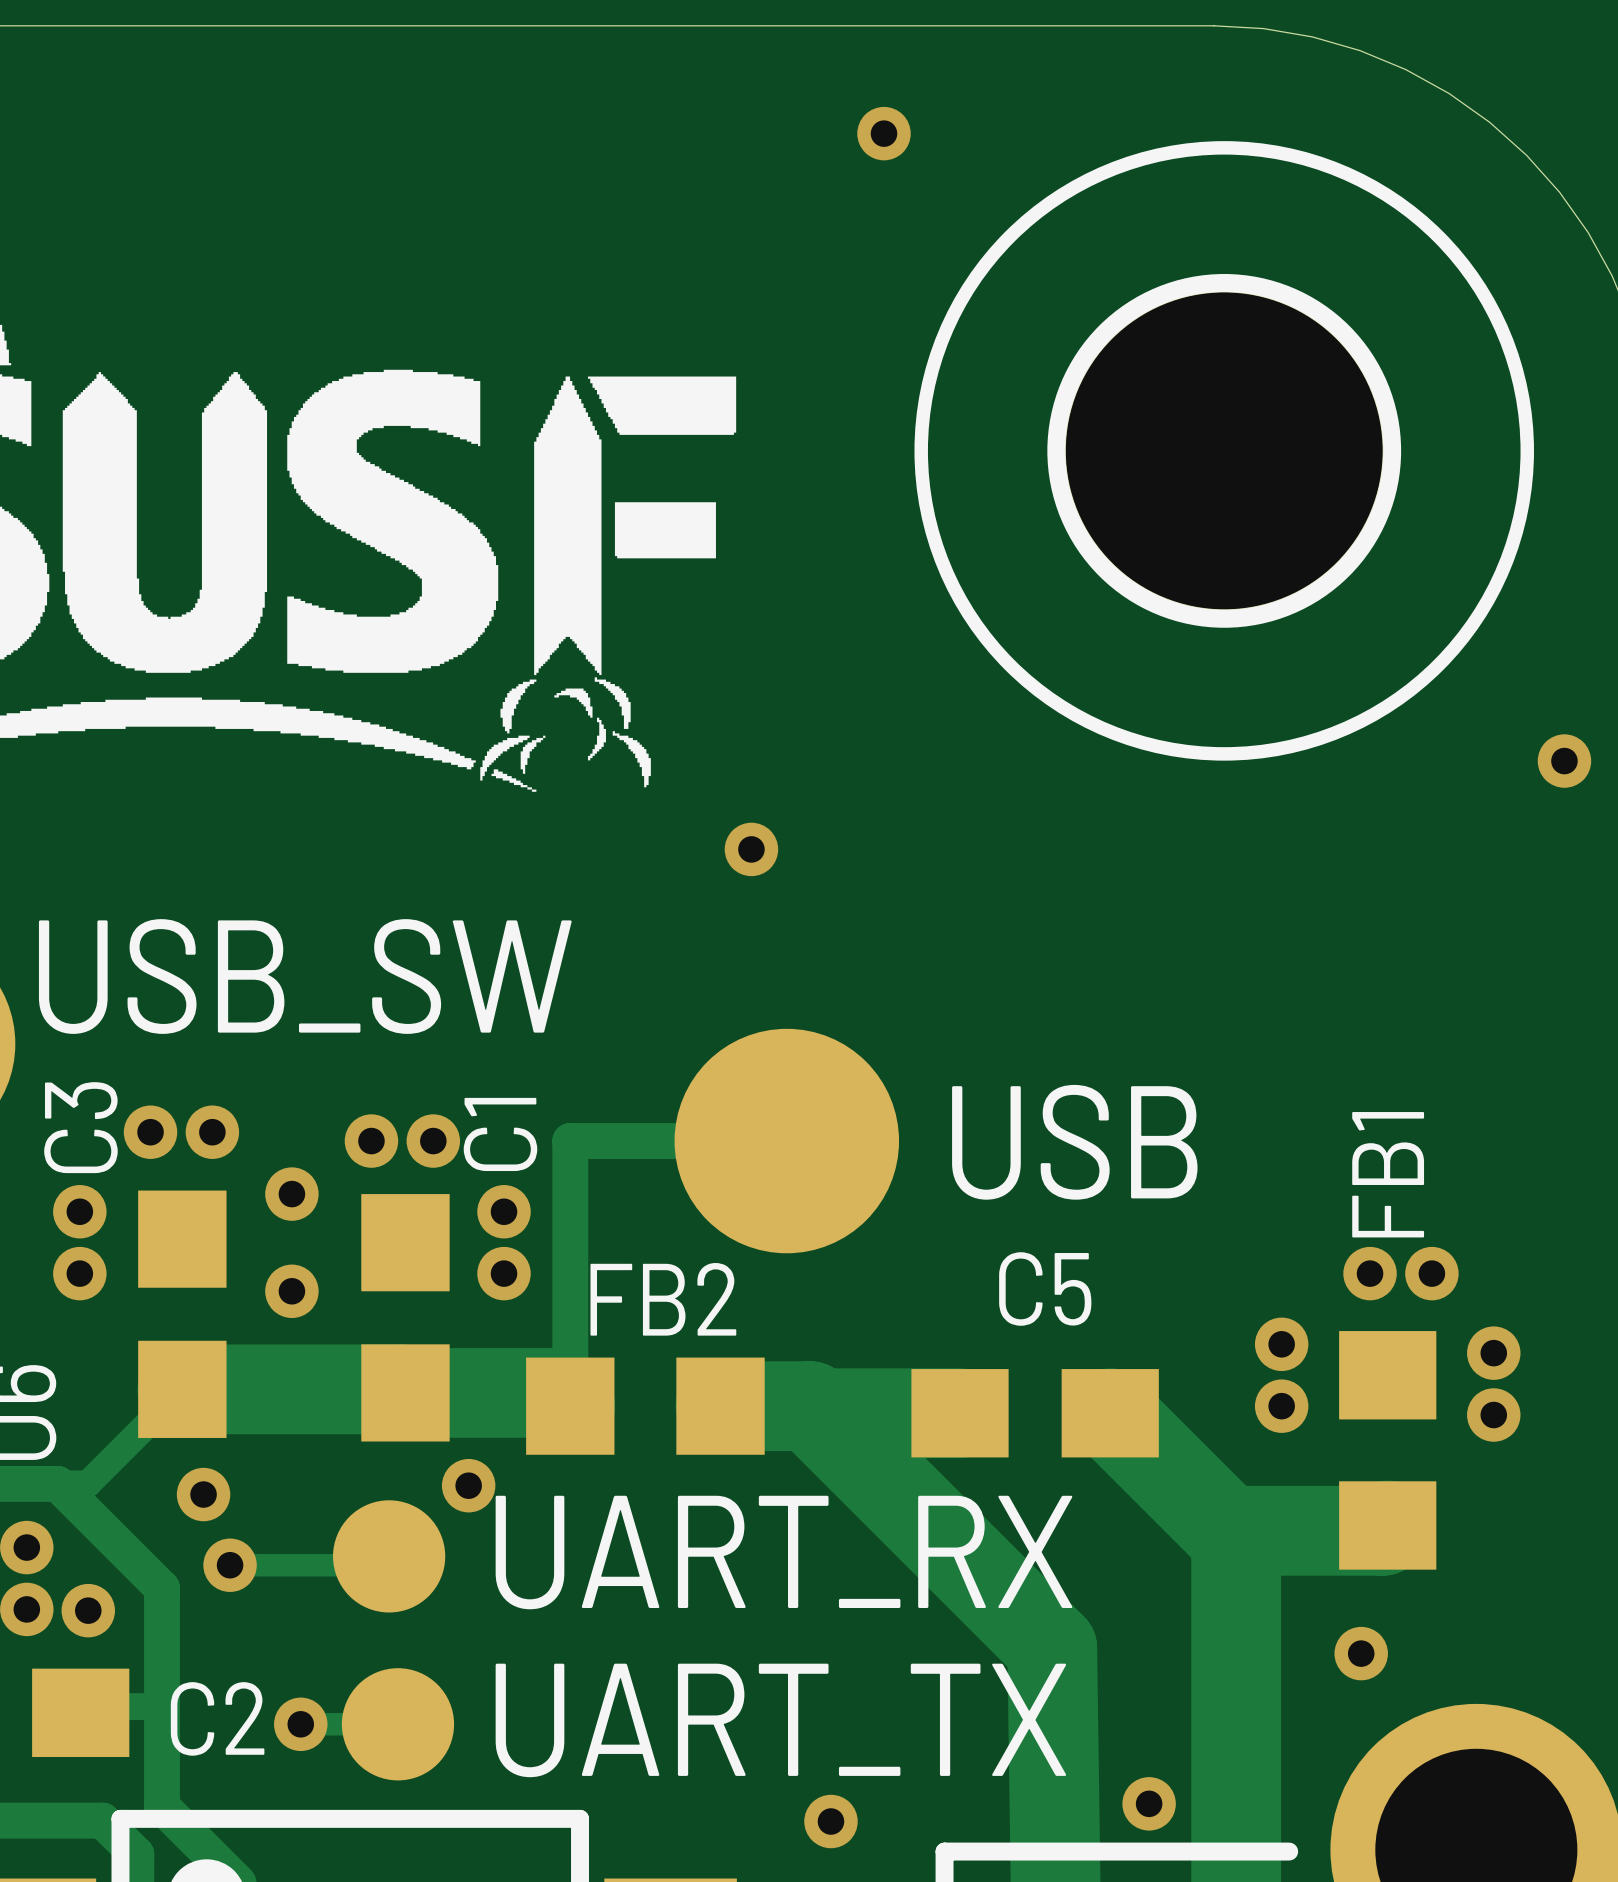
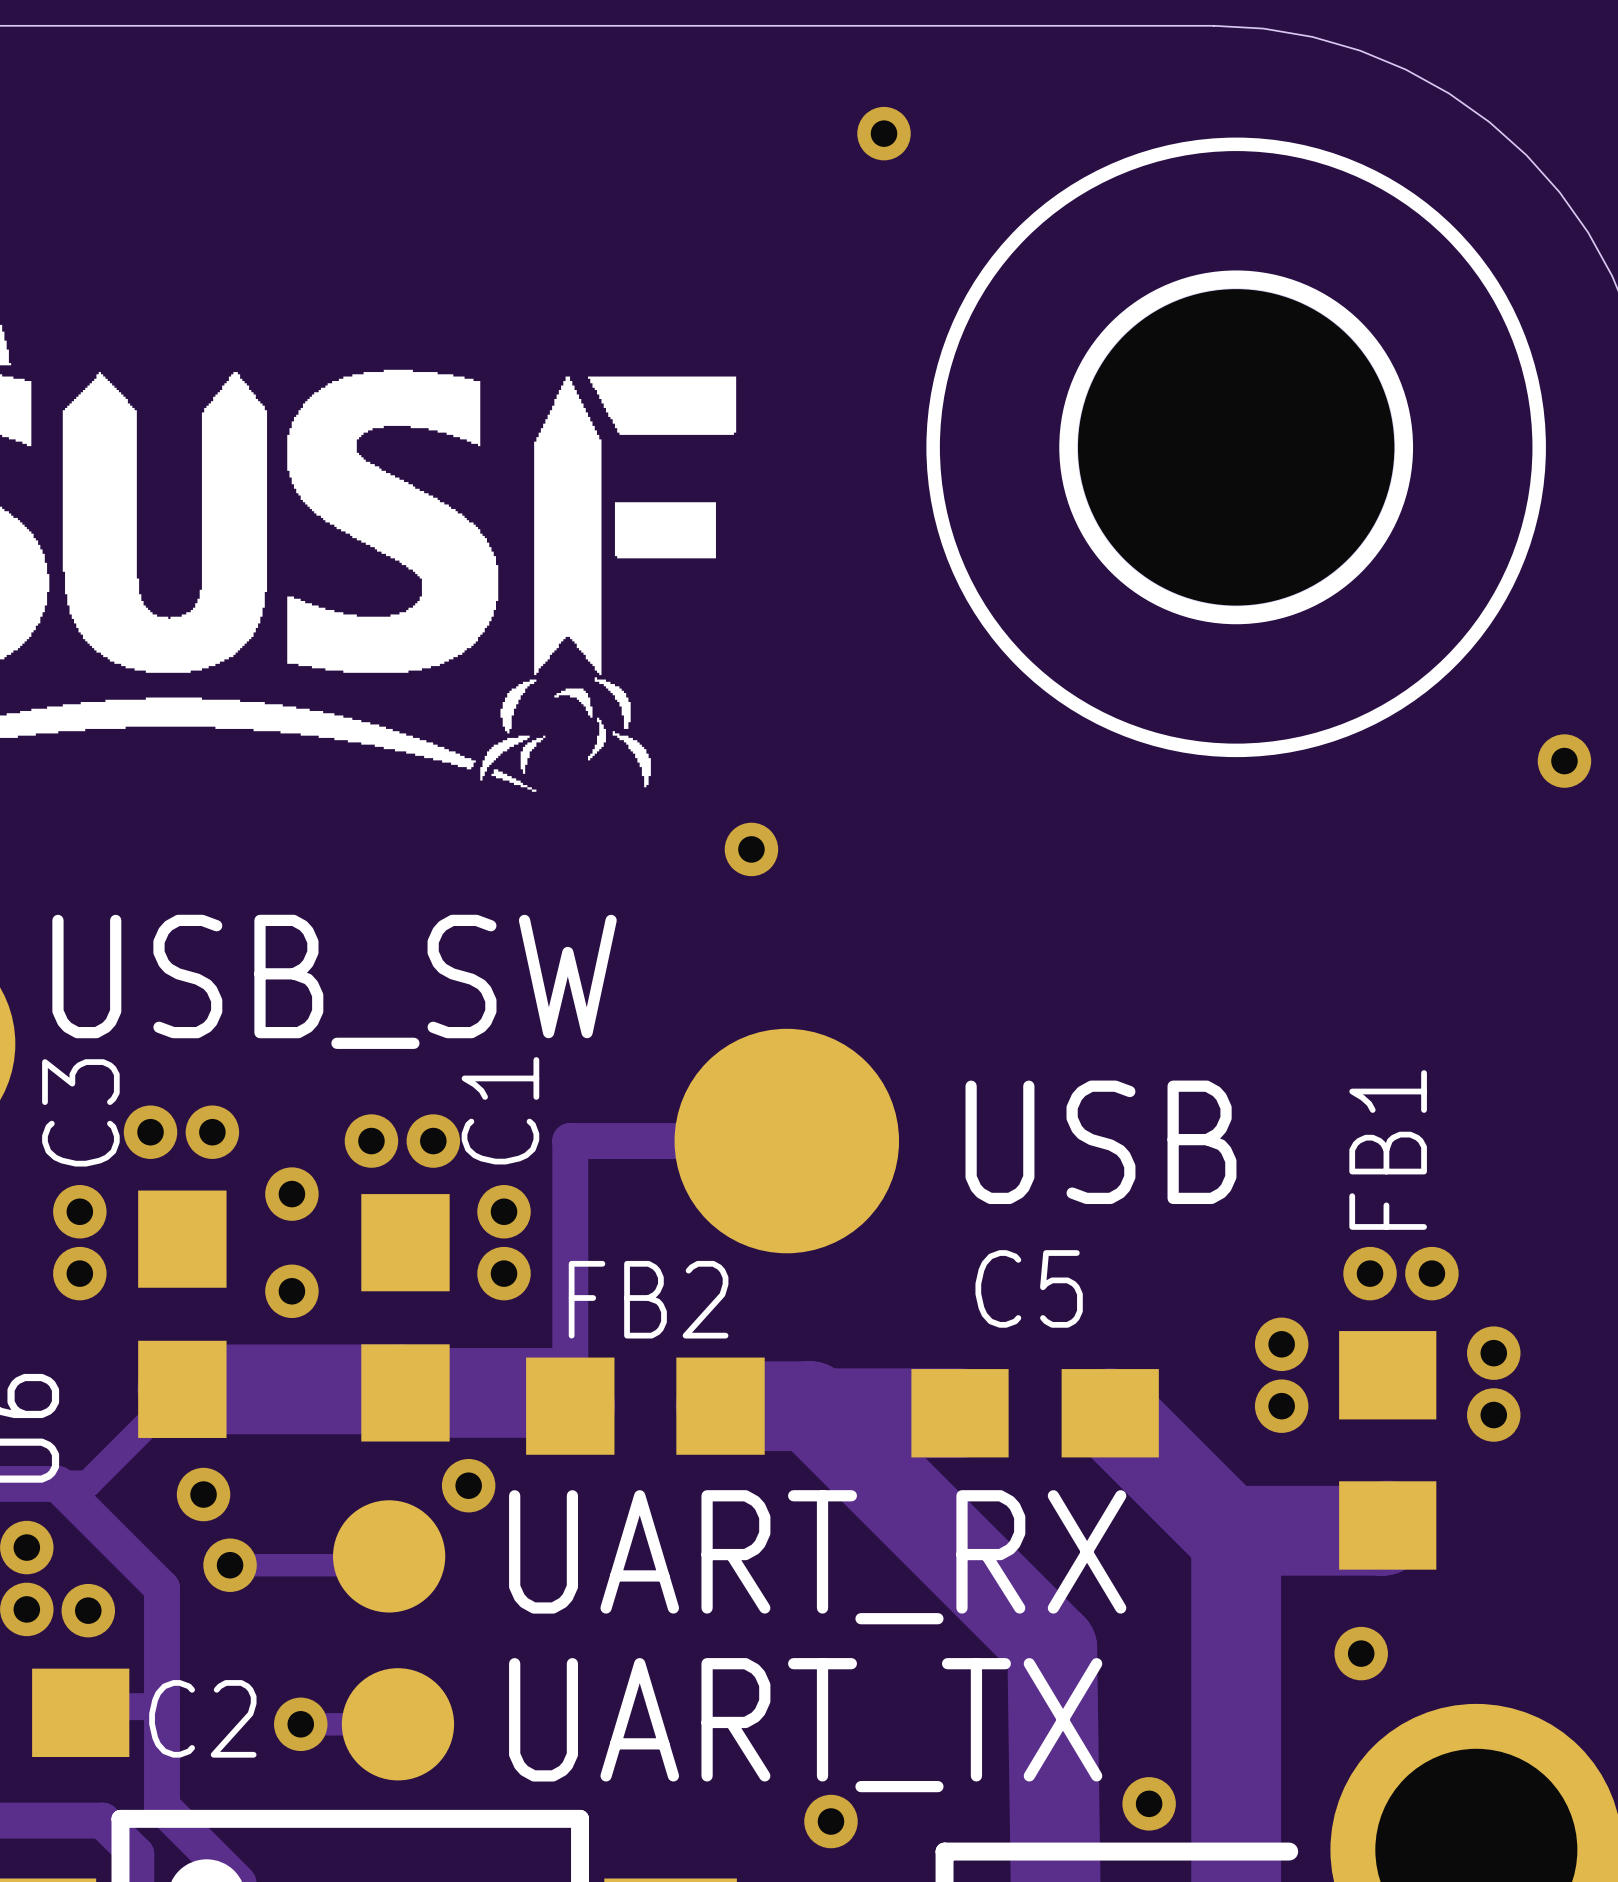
part position: (1224, 450) -> (1236, 447)

